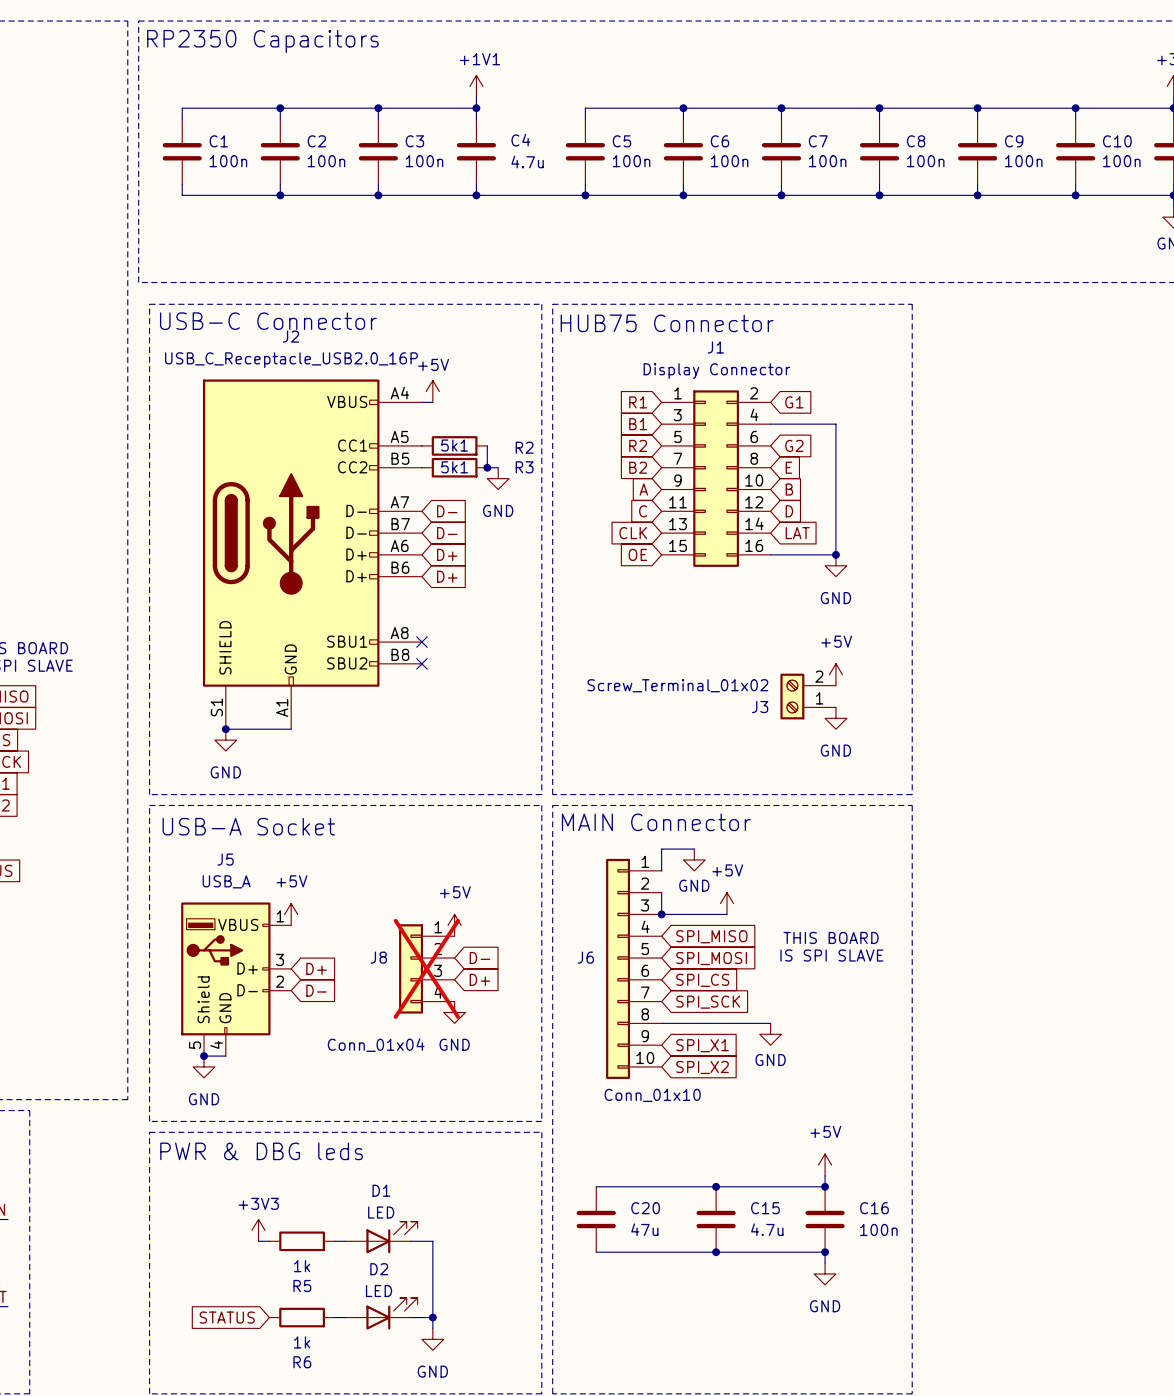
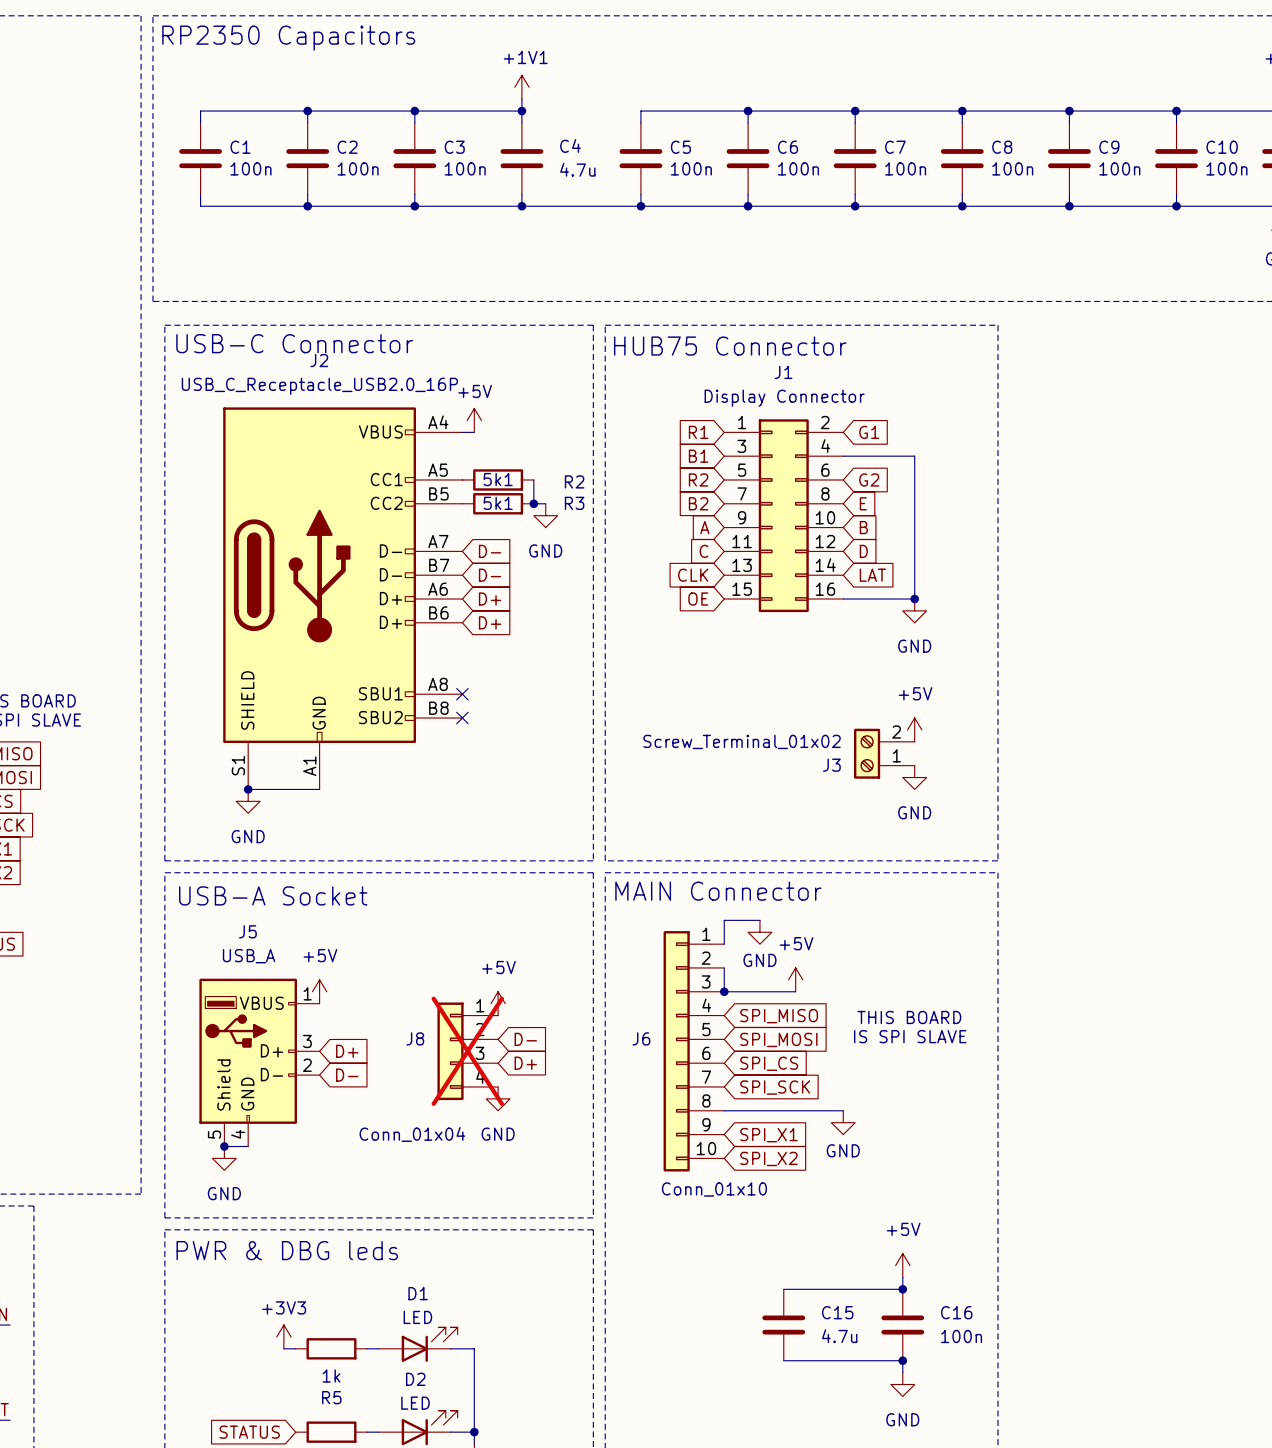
wire: (596, 1186) (716, 1186) -> none
junction: (716, 1186) -> none
C20: 47u (596, 1219) -> none
wire: (596, 1252) (716, 1252) -> none
junction: (716, 1252) -> none

